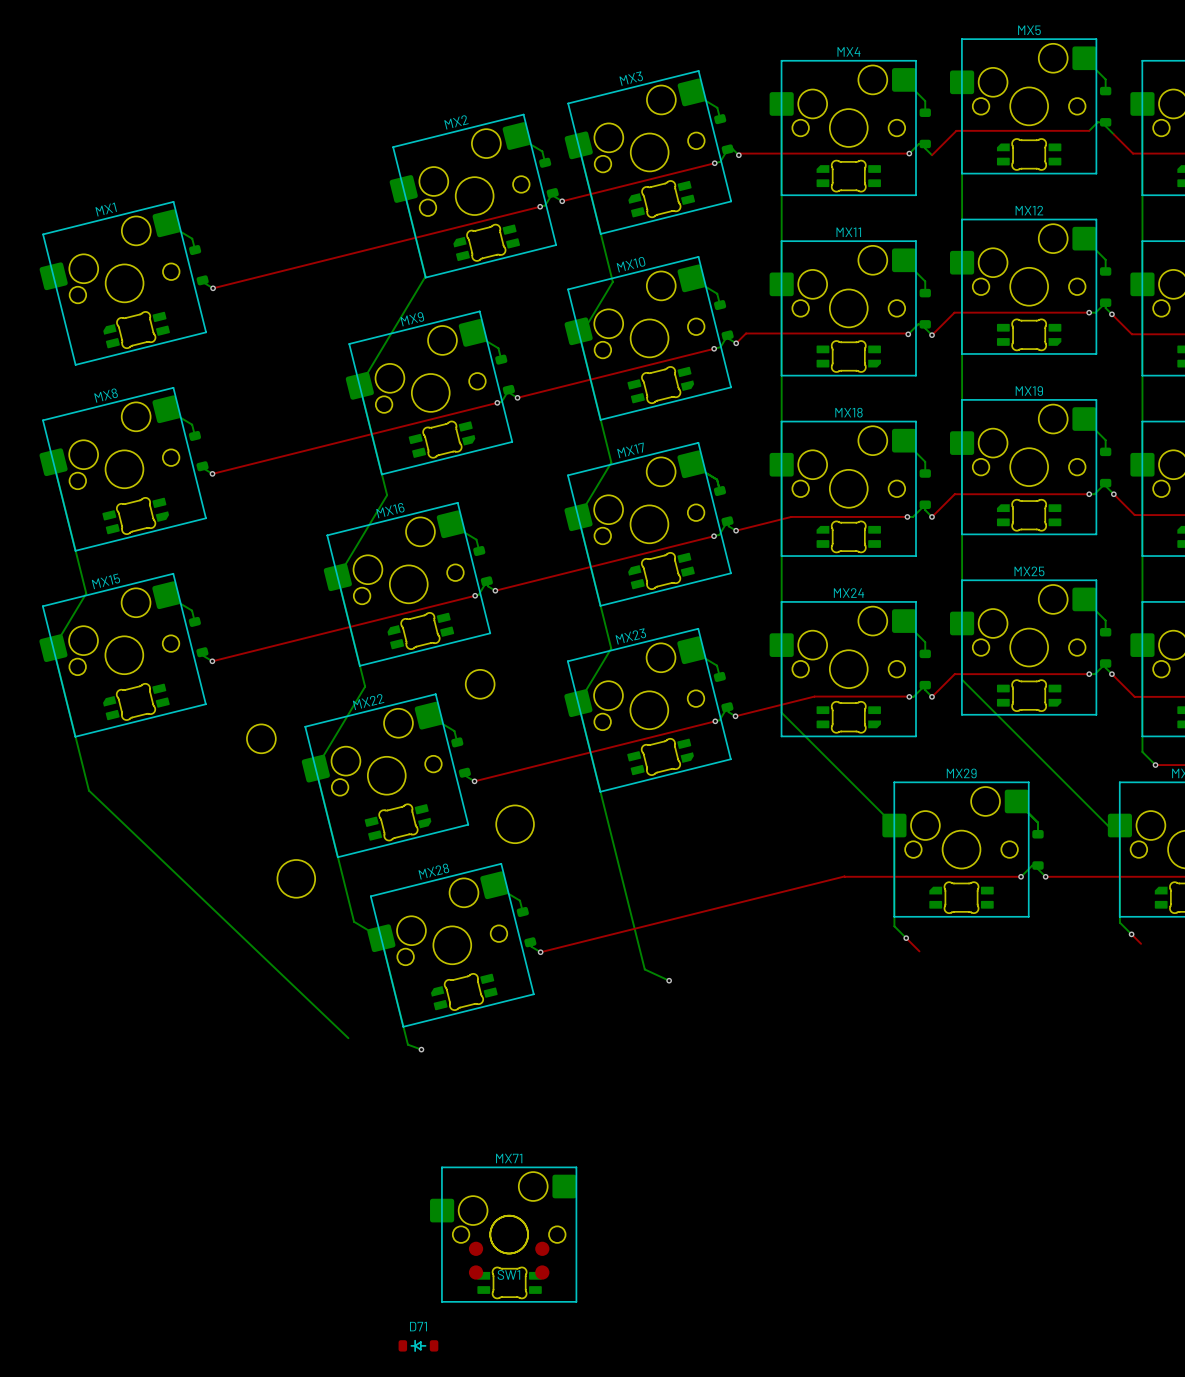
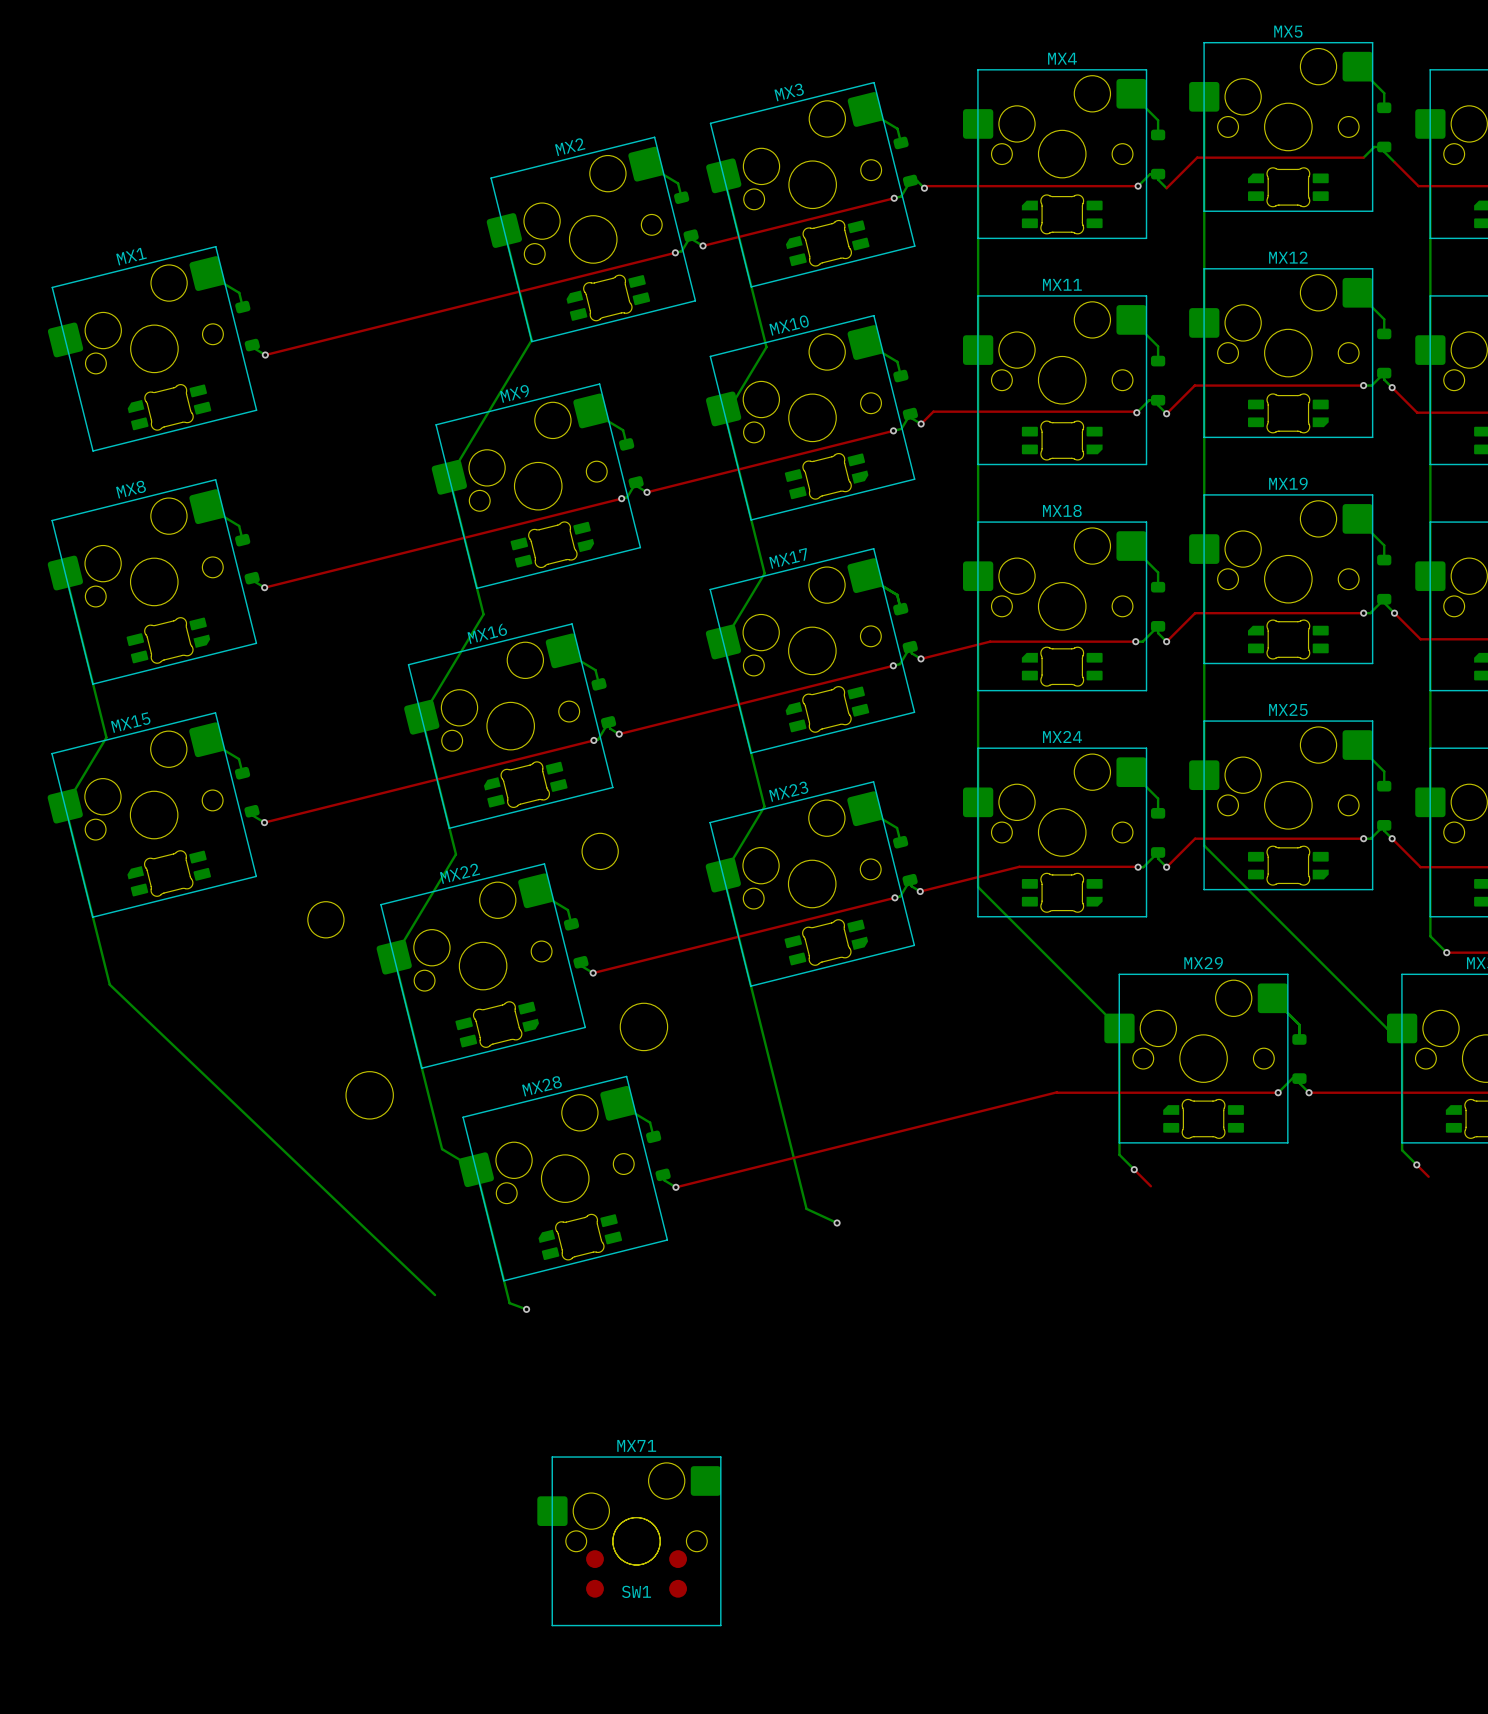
part: (509, 1282) -> none
D71: (418, 1345) -> none

